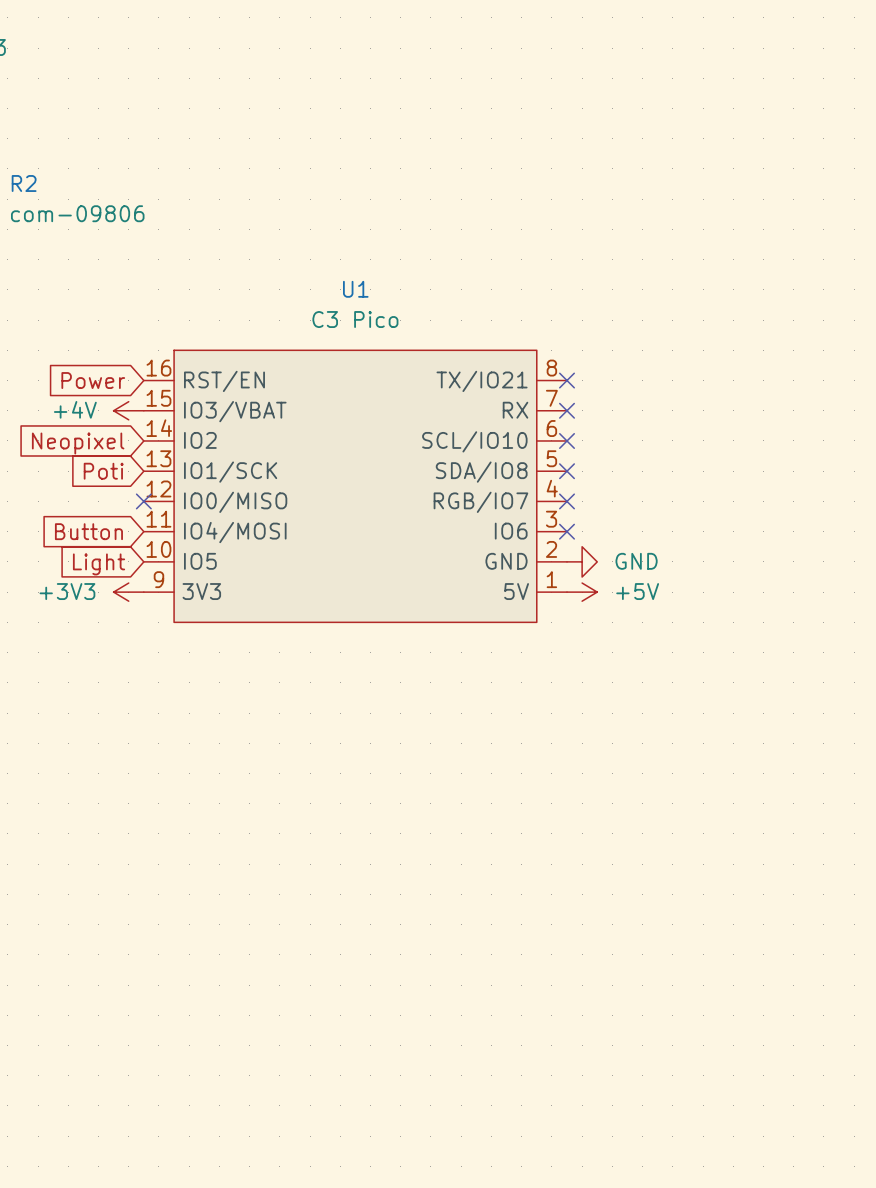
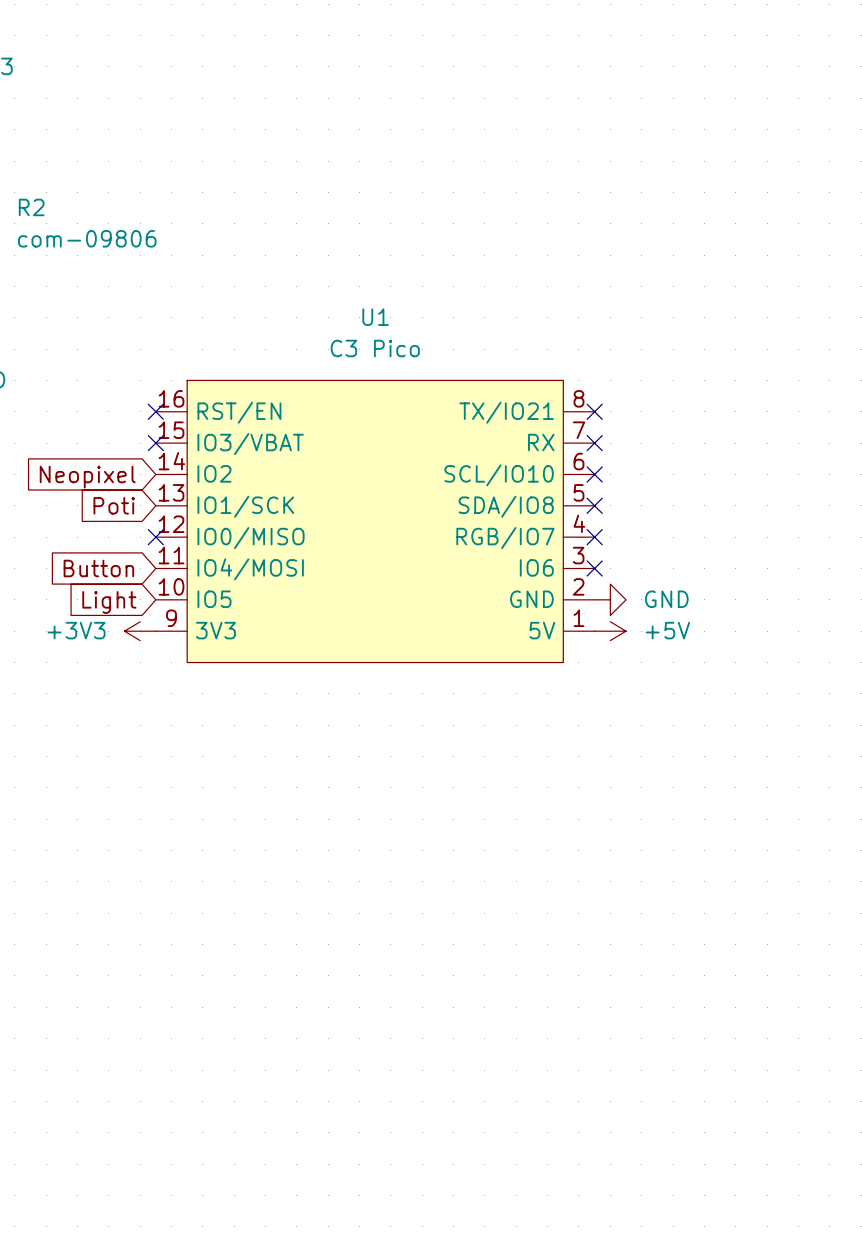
global label: Power (93, 380) -> none
no-connect mark: none -> (155, 411)
power symbol: +4V (128, 410) -> none
no-connect mark: none -> (155, 443)

